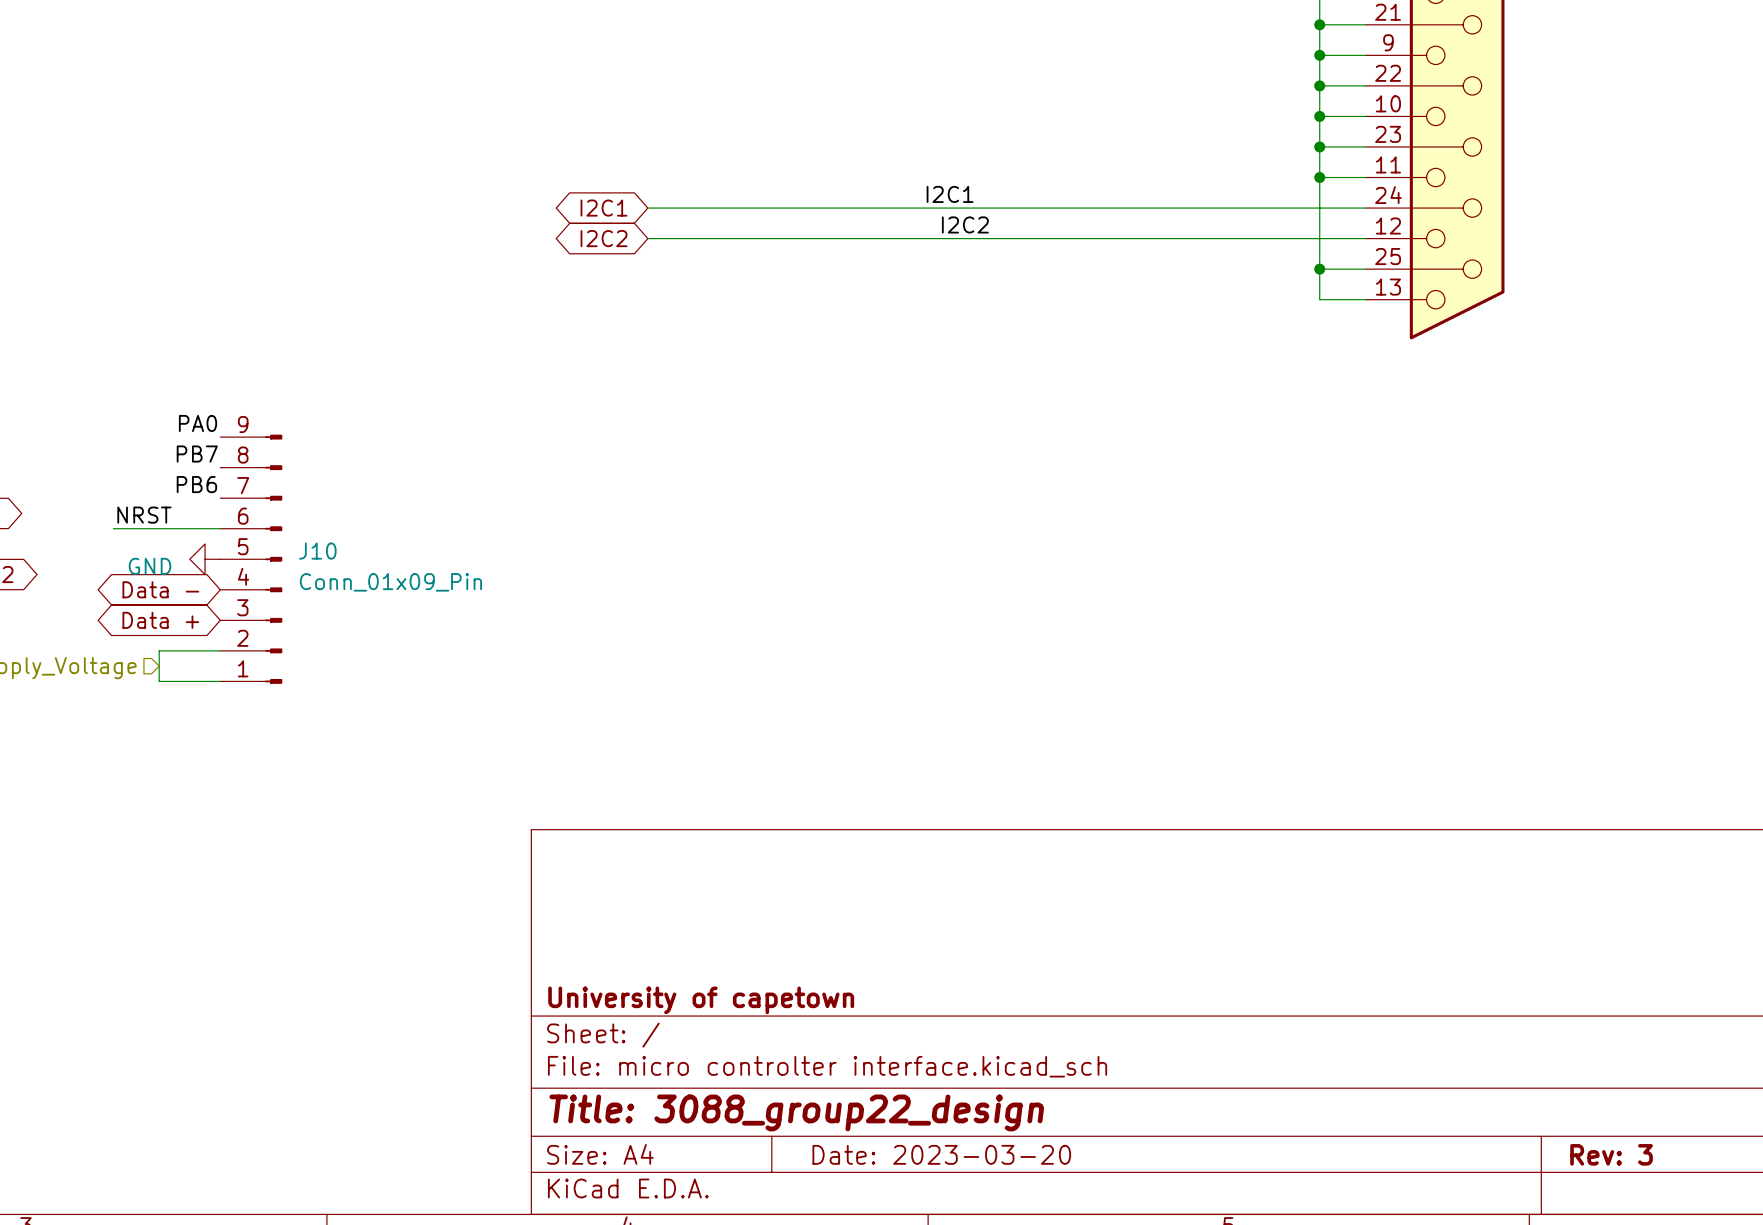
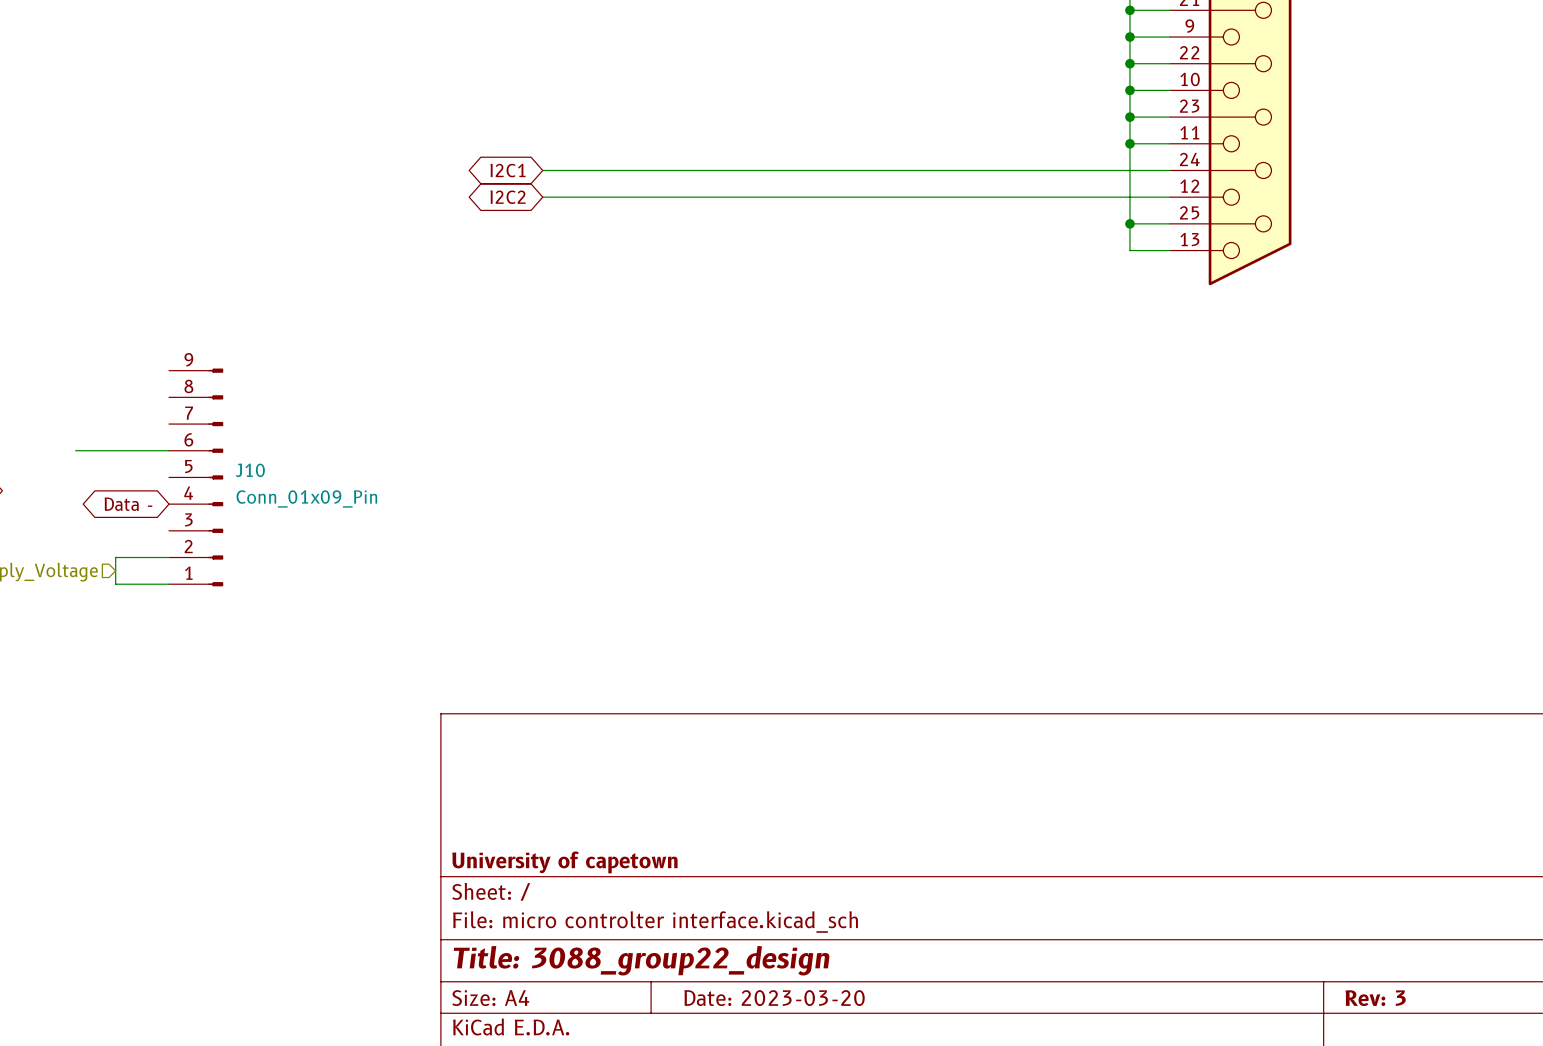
label: I2C1 (950, 194) -> none
label: I2C2 (965, 224) -> none
label: PA0 (198, 423) -> none
label: PB7 (197, 454) -> none
label: PB6 (196, 484) -> none
label: NRST (144, 515) -> none
power symbol: GND (205, 559) -> none
global label: Data + (160, 620) -> none

